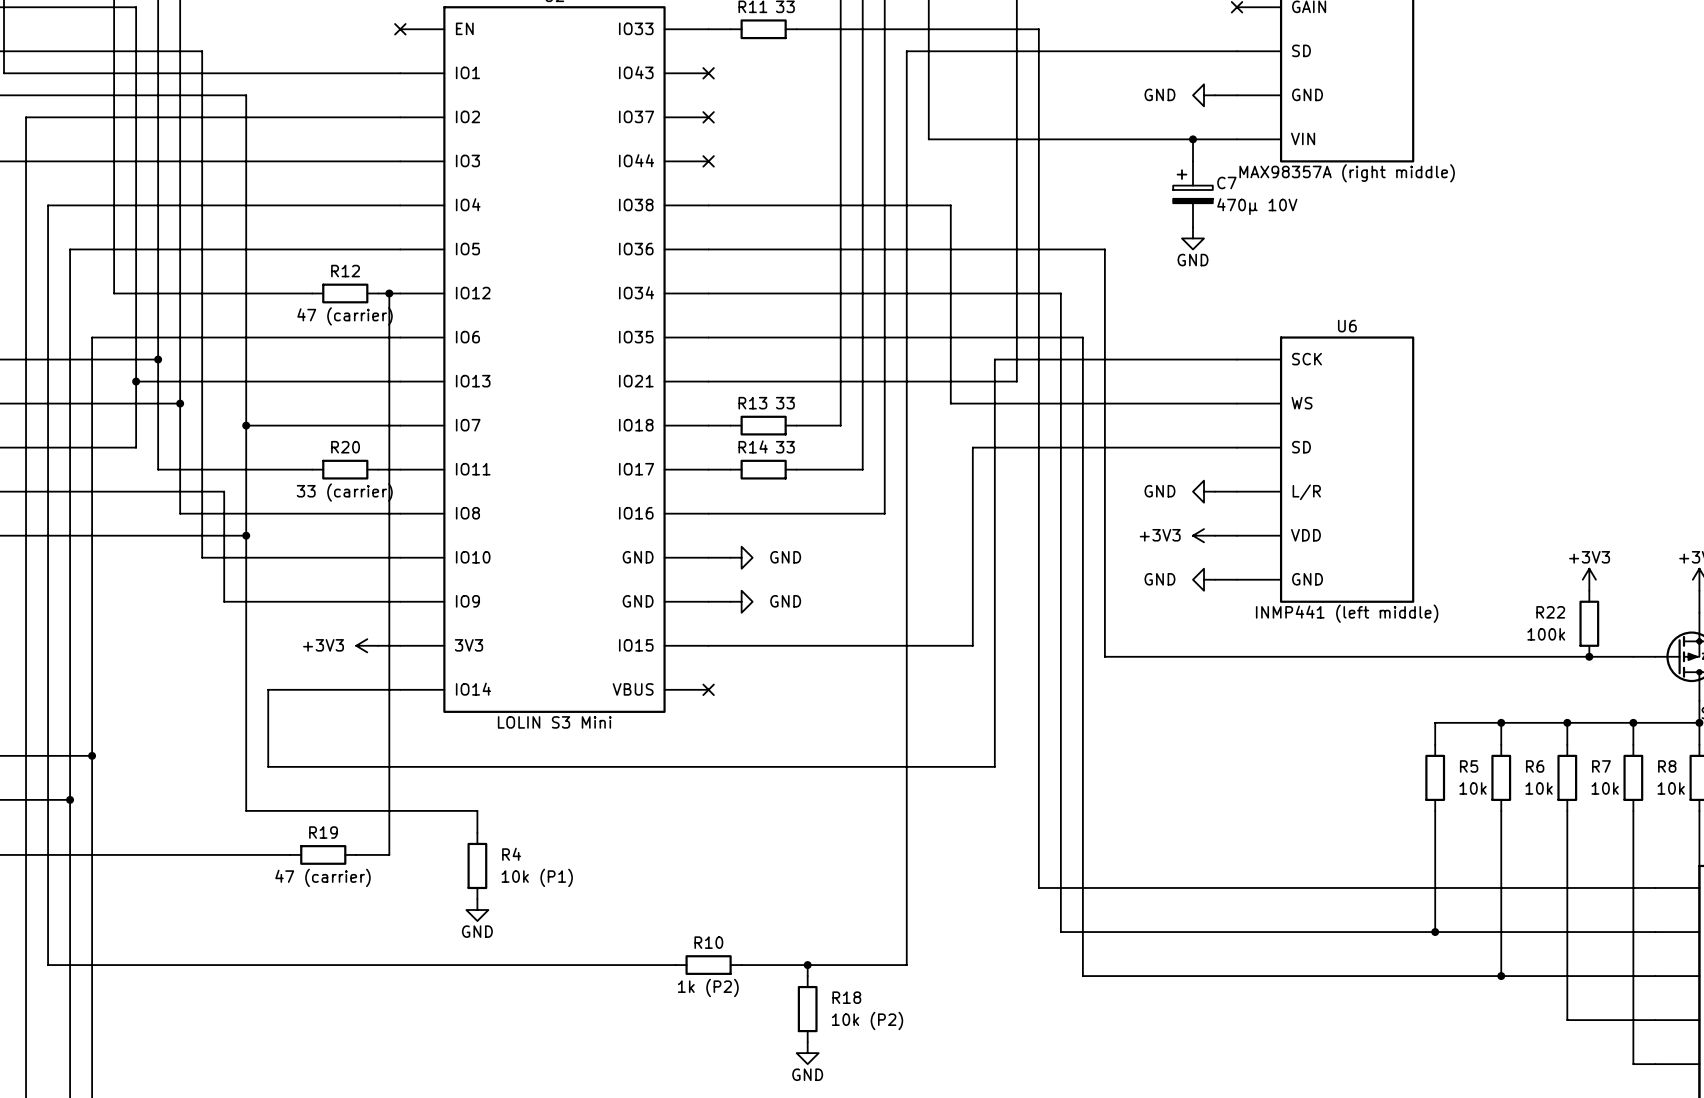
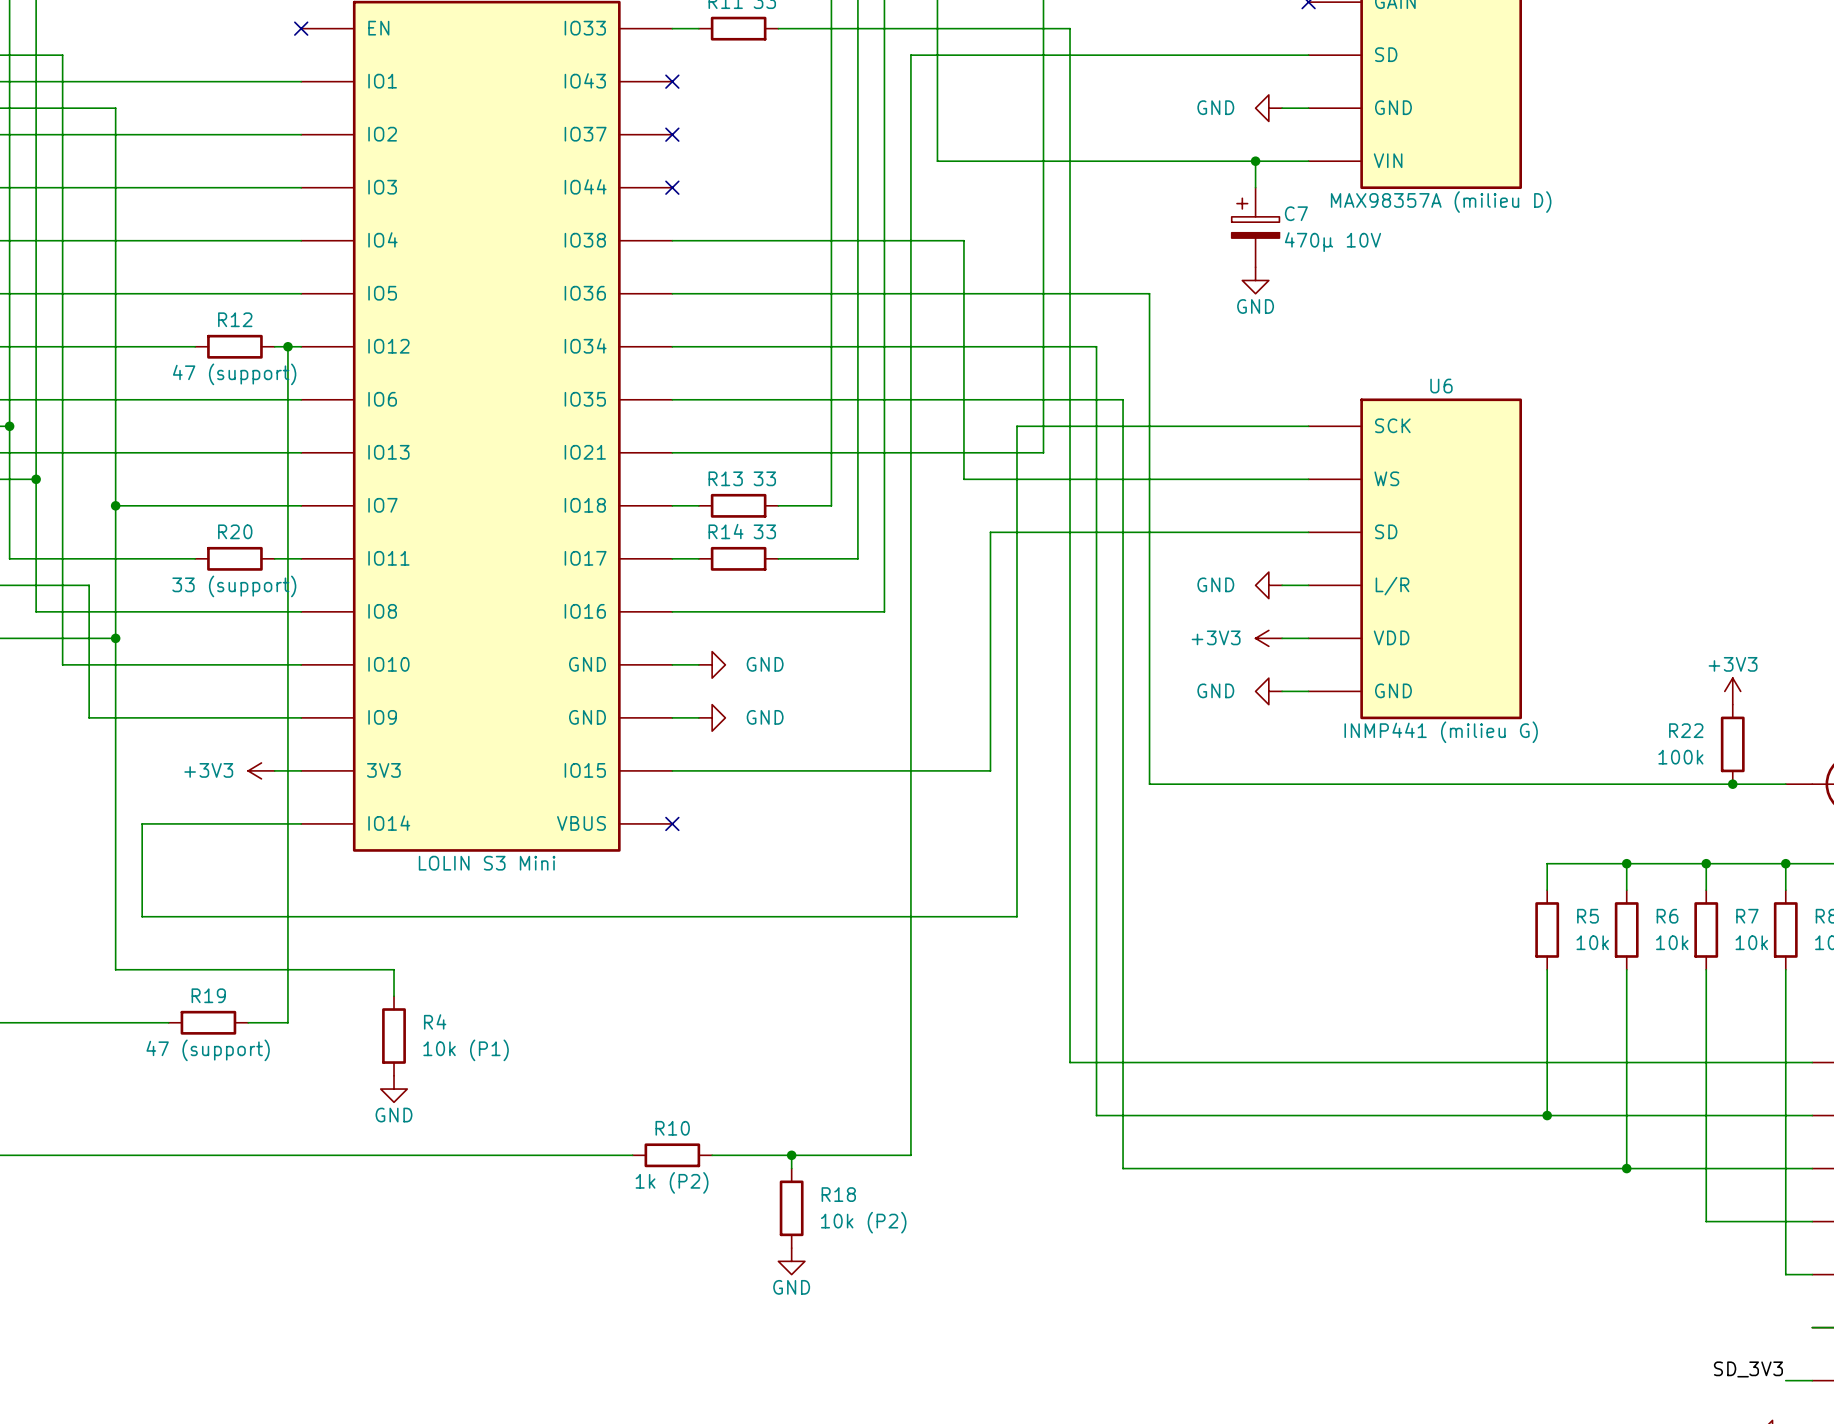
part value: MAX98357A (right middle) (1347, 173) -> MAX98357A (milieu D) (1441, 202)
R12 value: 47 (carrier) (345, 316) -> 47 (support) (234, 374)
R20 value: 33 (carrier) (344, 492) -> 33 (support) (234, 586)
U6 value: INMP441 (left middle) (1347, 613) -> INMP441 (milieu G) (1441, 732)
R19 value: 47 (carrier) (323, 877) -> 47 (support) (208, 1050)

